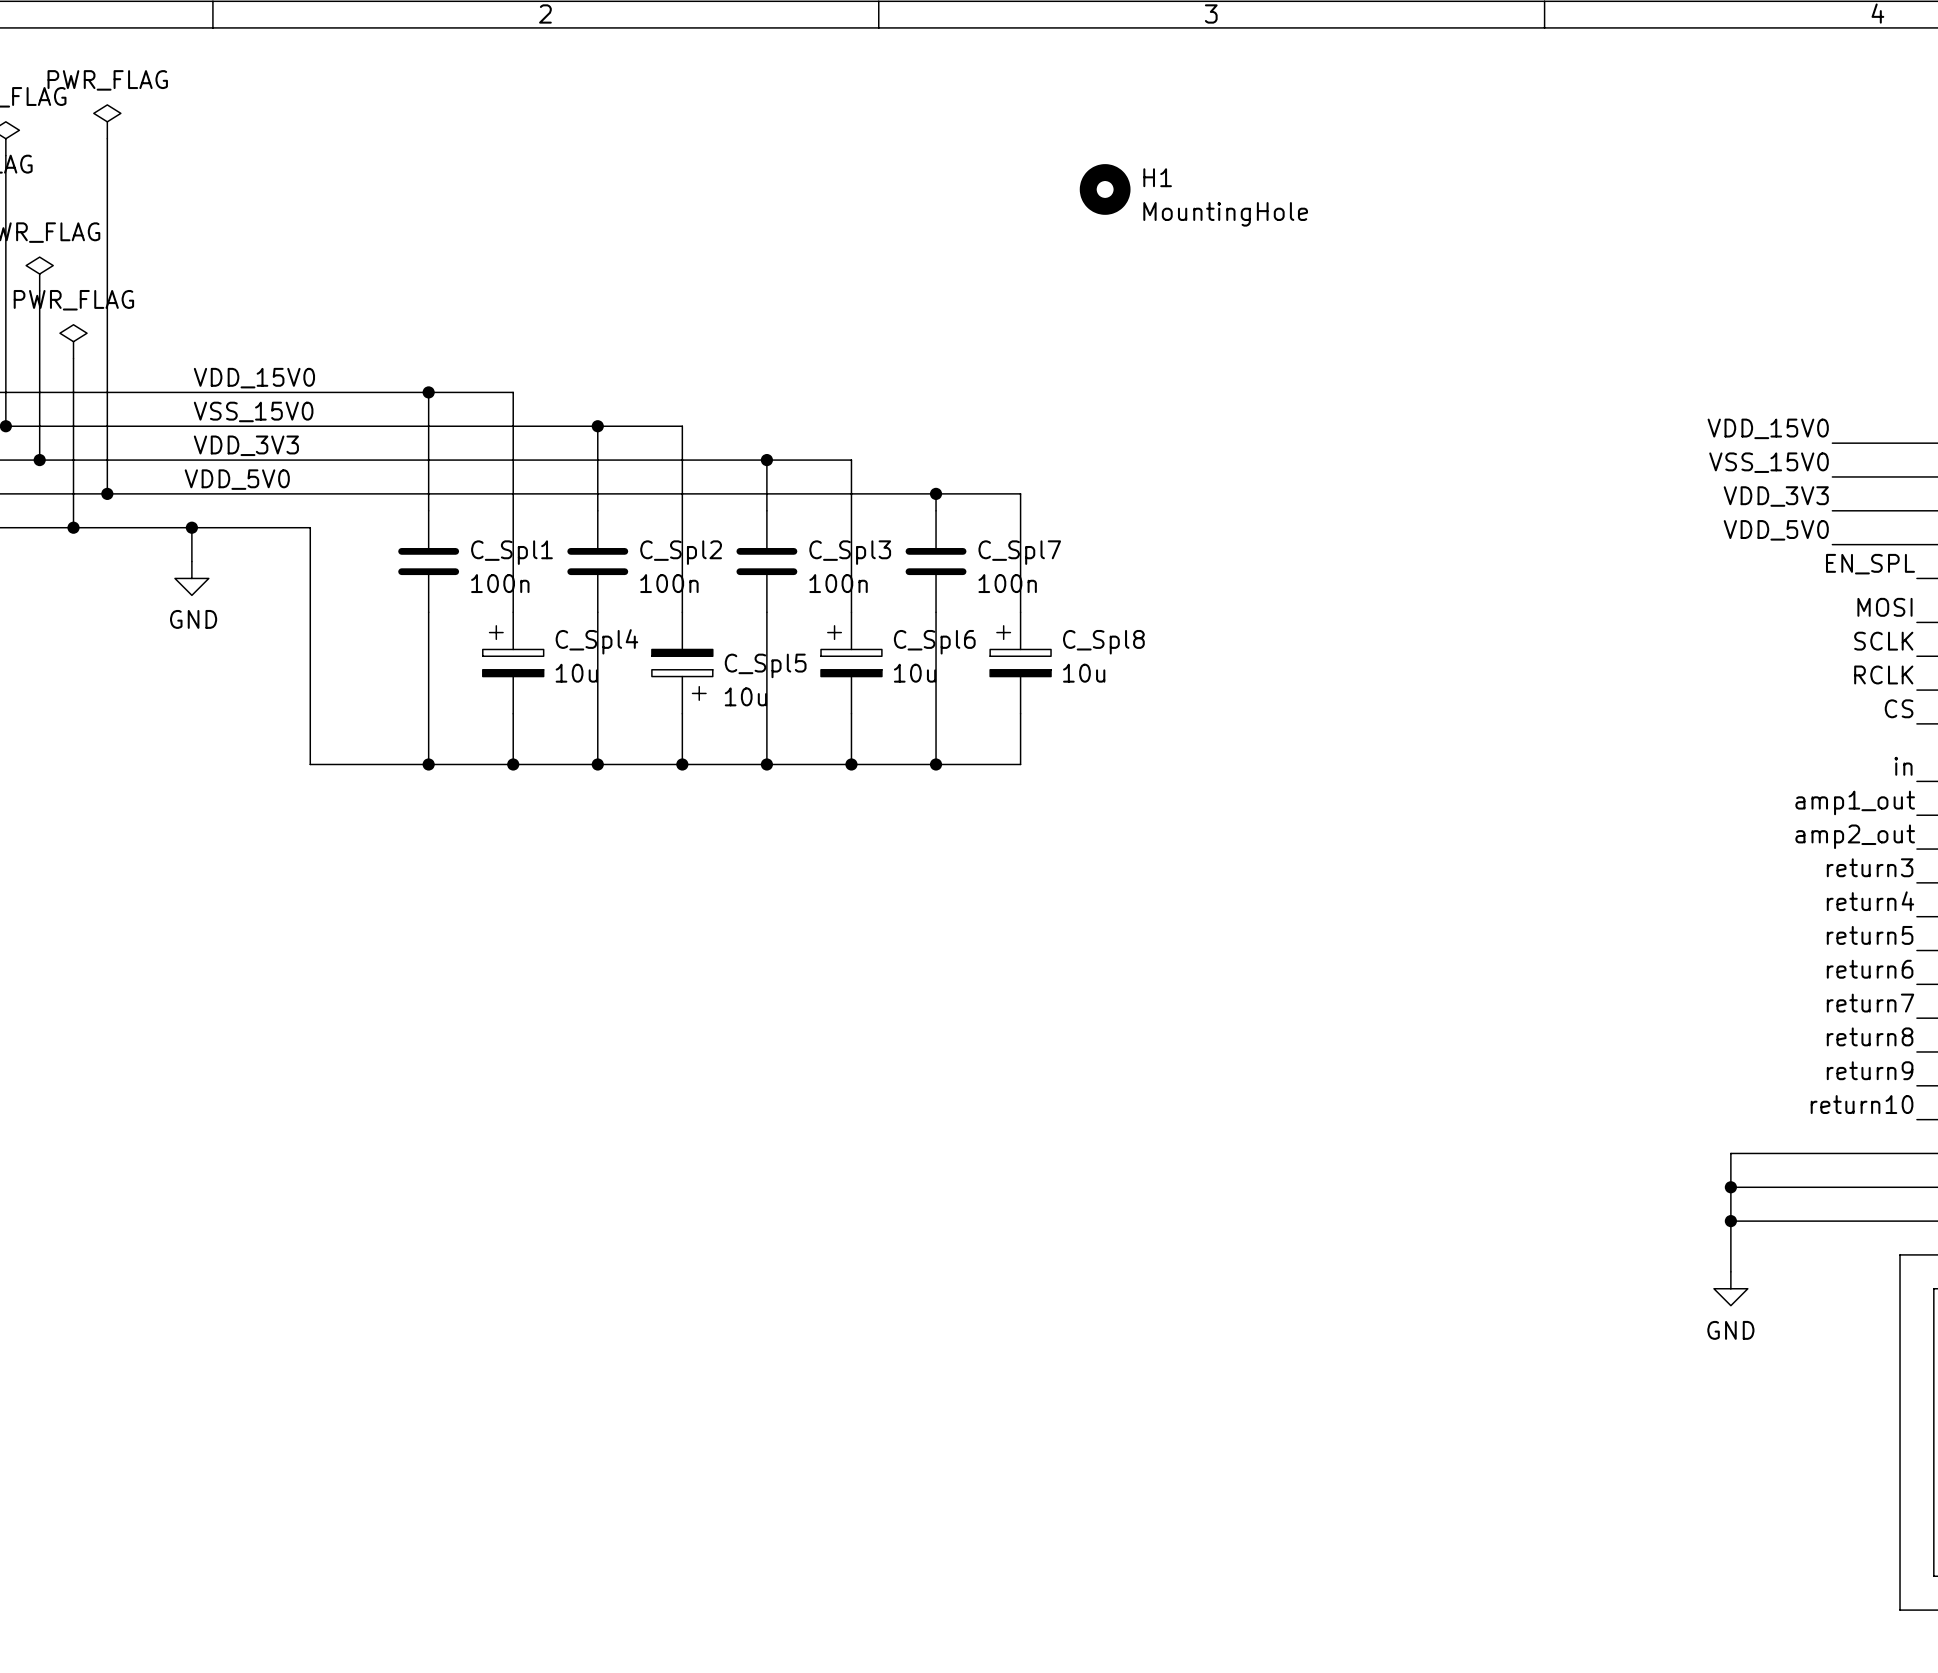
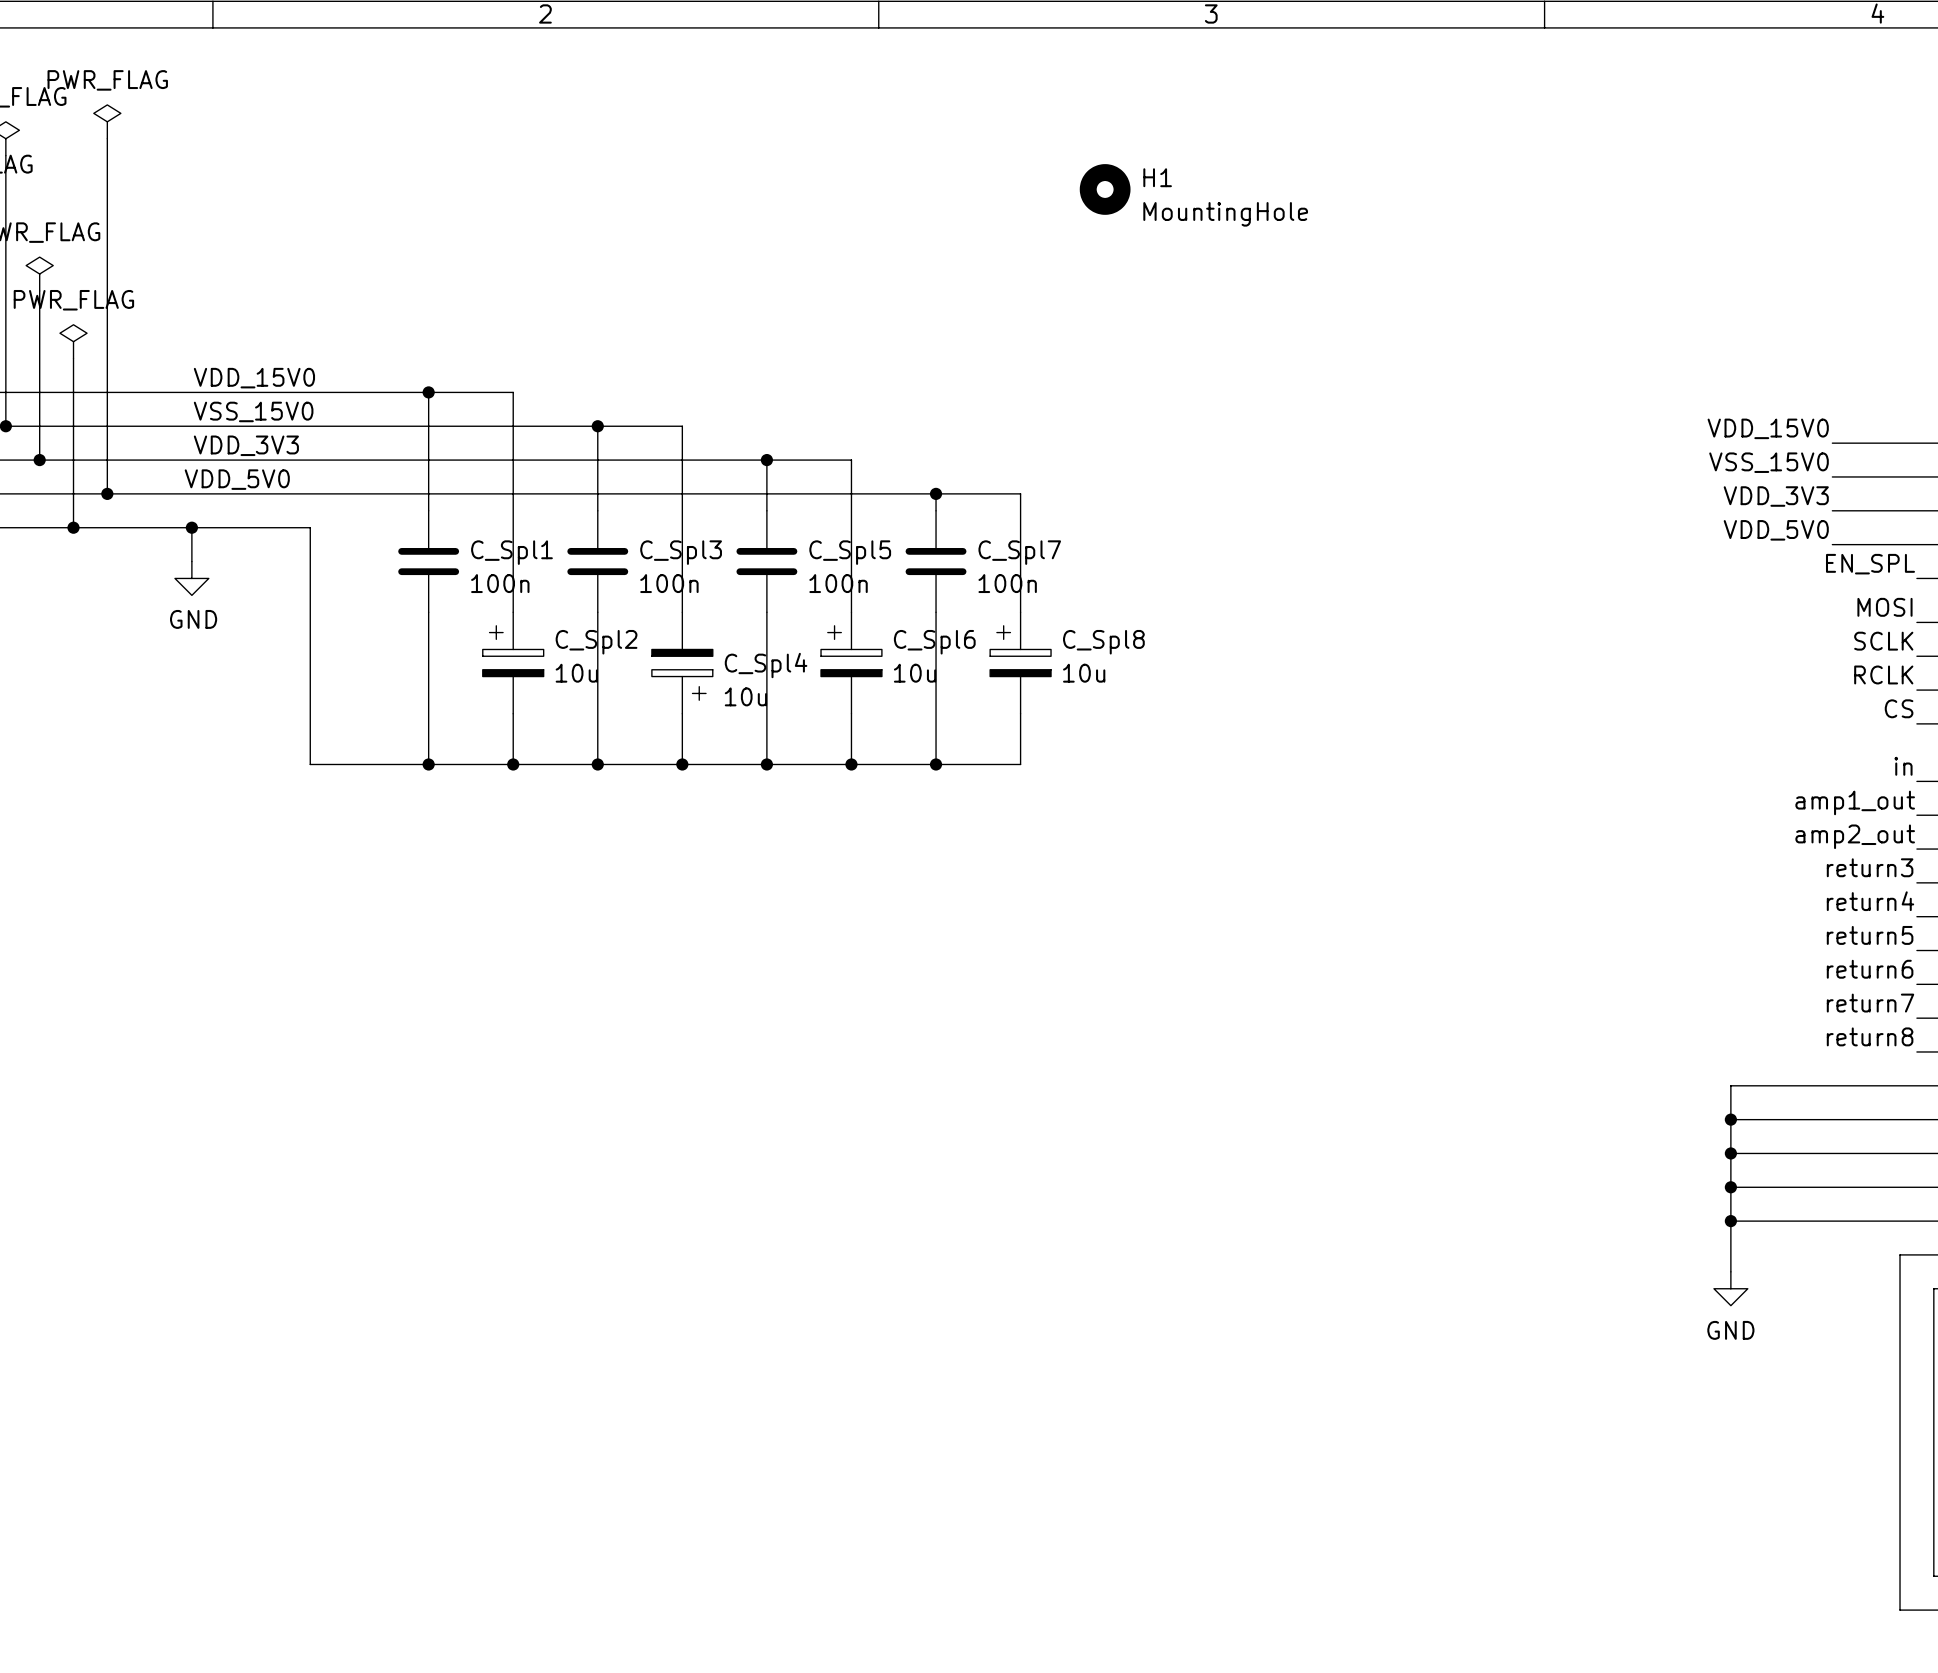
C_Spl2 name: C_Spl2 (681, 552) -> C_Spl3 (681, 552)
C_Spl3 name: C_Spl3 (850, 552) -> C_Spl5 (850, 552)
C_Spl4 name: C_Spl4 (596, 641) -> C_Spl2 (596, 642)
C_Spl5 name: C_Spl5 (765, 665) -> C_Spl4 (766, 665)
label: return9 (1870, 1070) -> none
wire: none -> (1916, 1085) (1730, 1085) (1730, 1153)
label: return10 (1862, 1104) -> none
wire: none -> (1730, 1119) (1916, 1119)
junction: none -> (1730, 1119)
junction: none -> (1730, 1153)

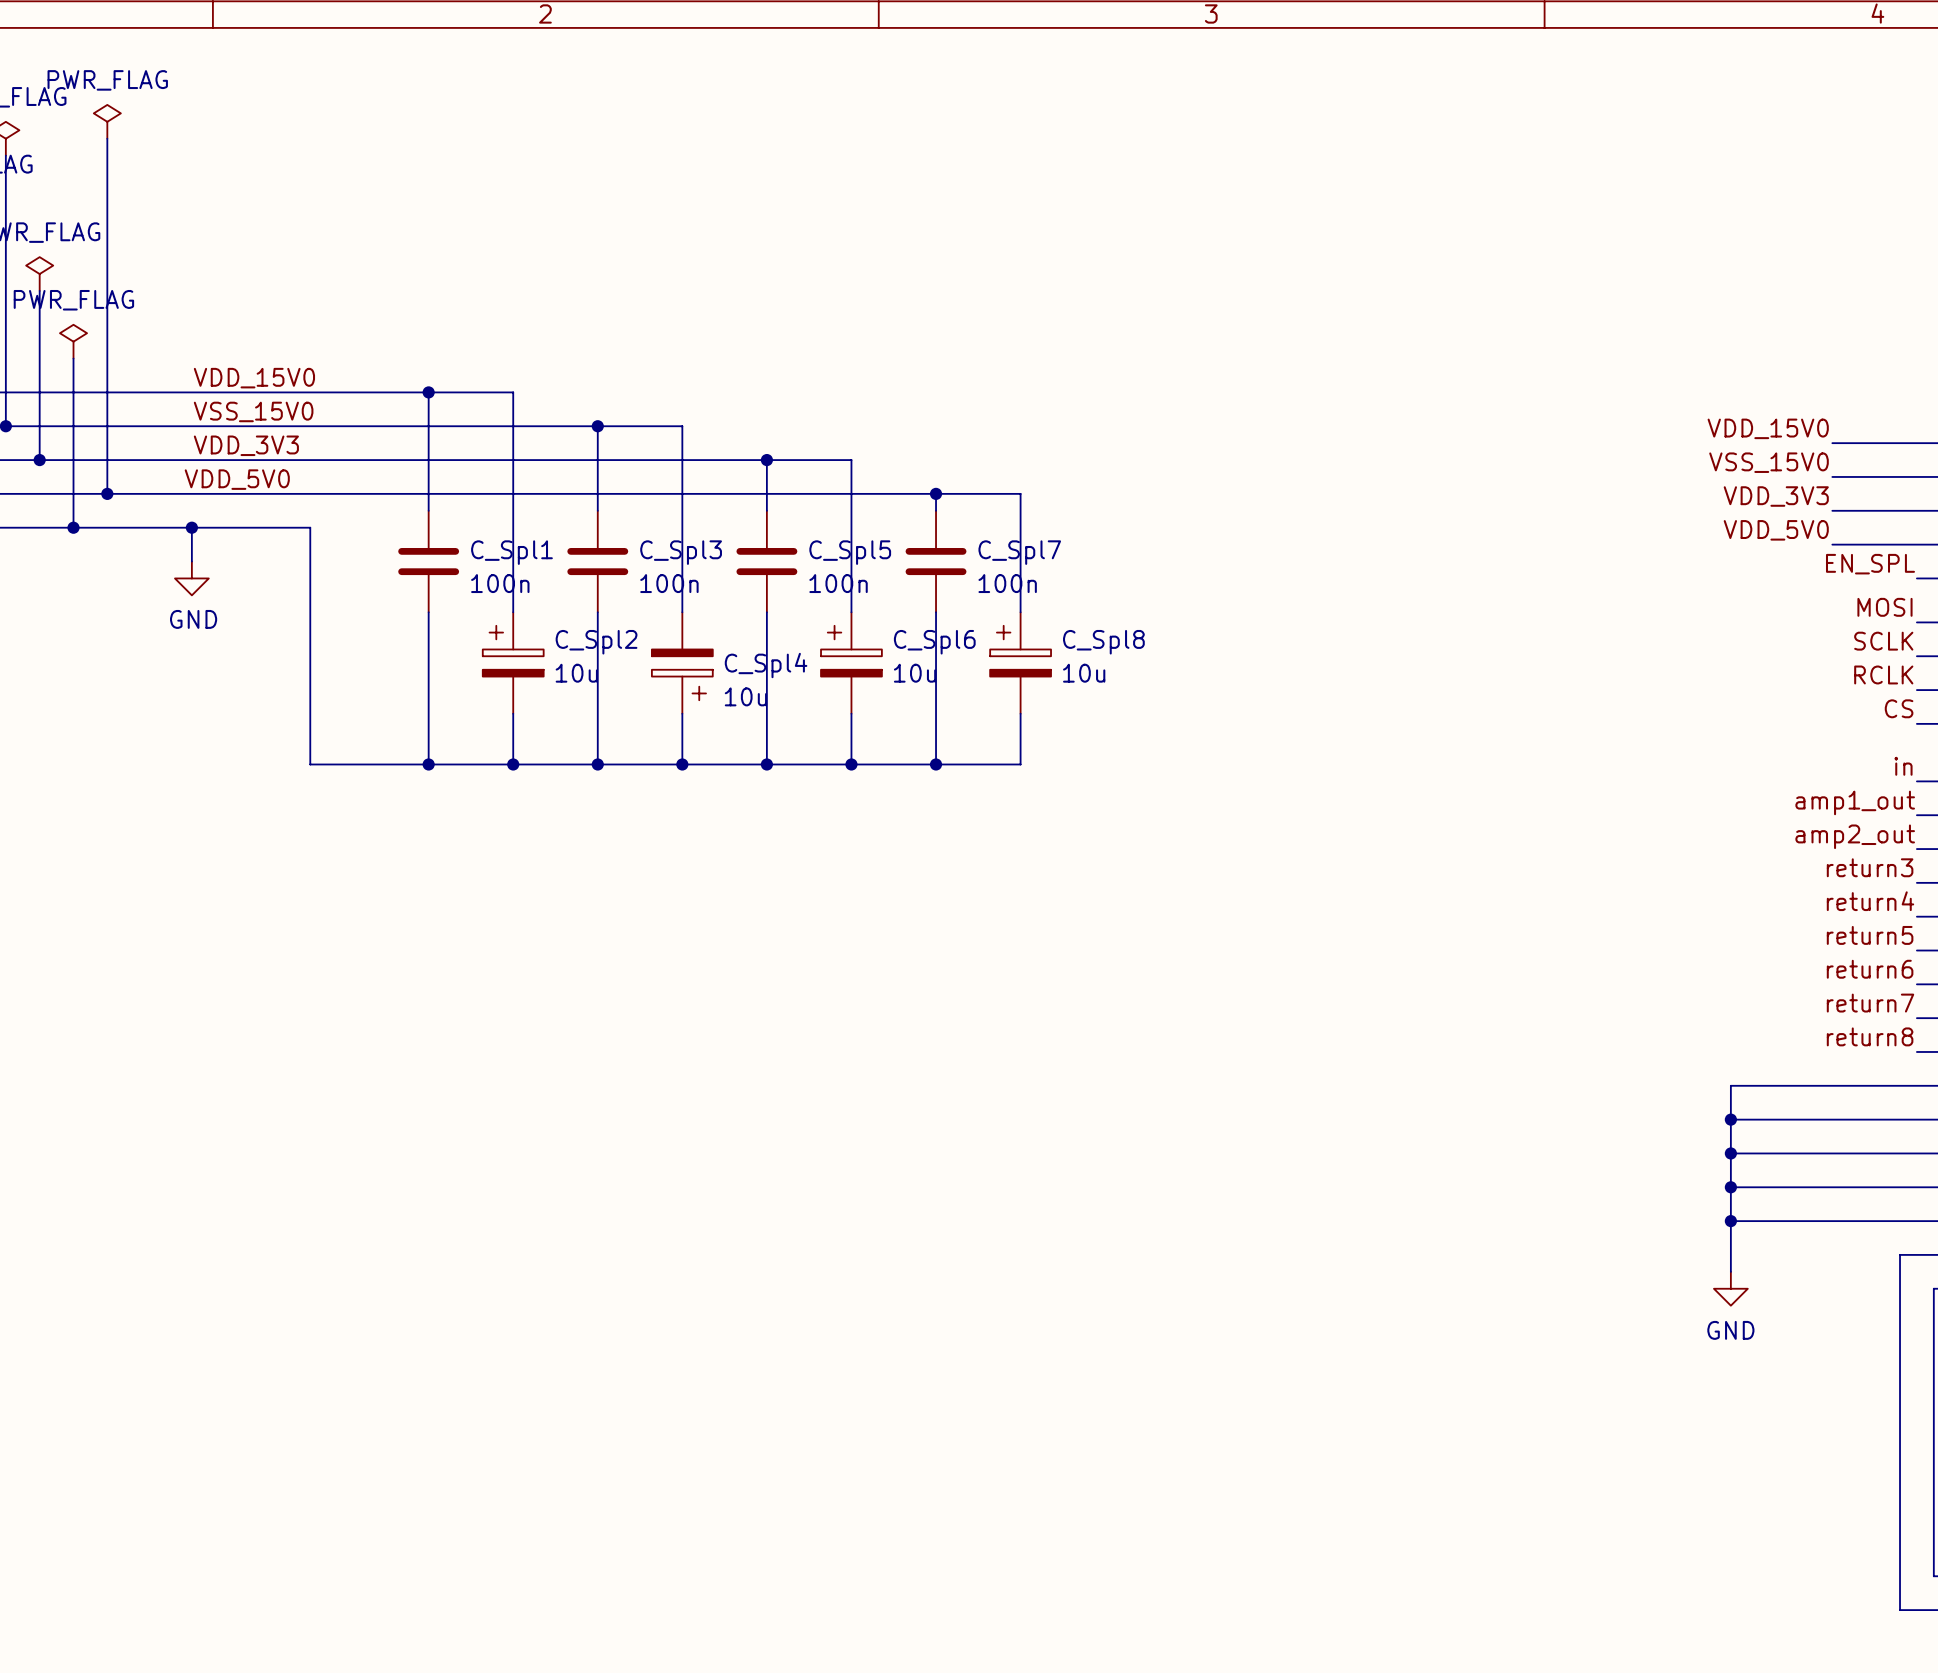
H1: MountingHole (1105, 189) -> none

